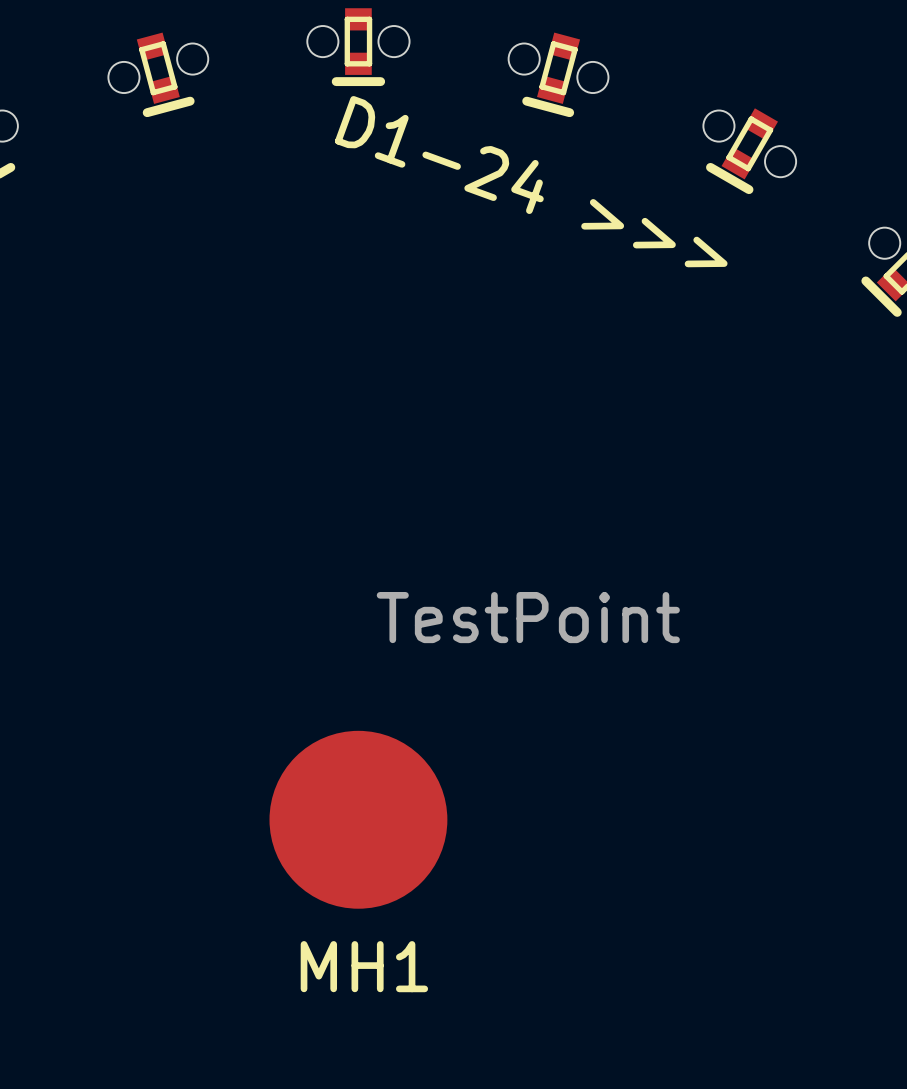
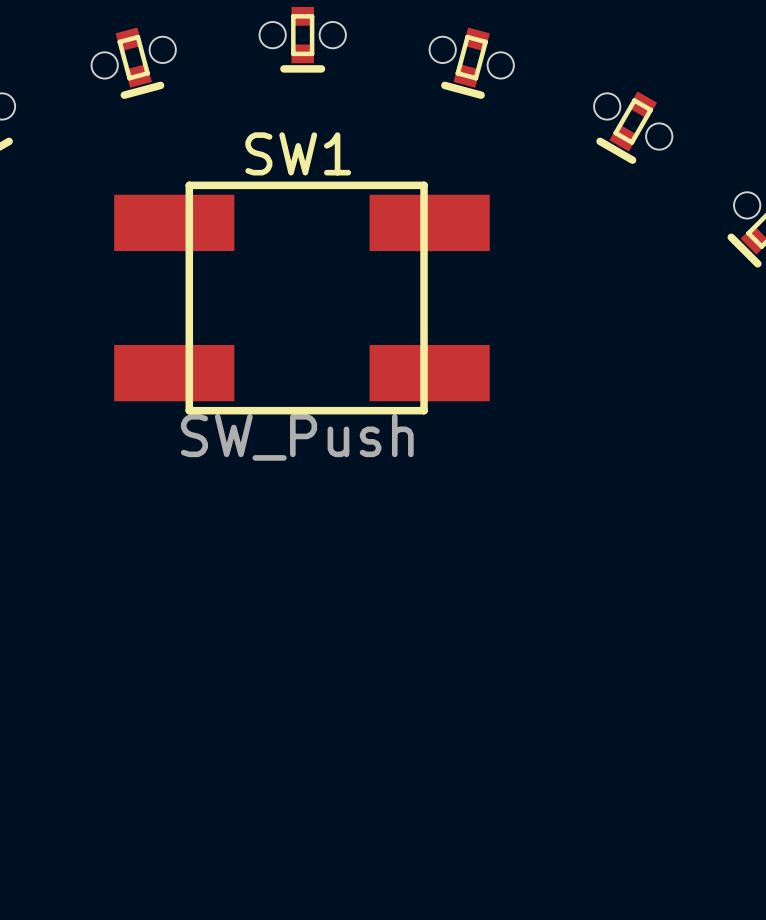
text: D1-24 >>> (531, 181) -> none
SW1: none -> SW_Push (301, 298)
MH1: TestPoint (358, 819) -> none

